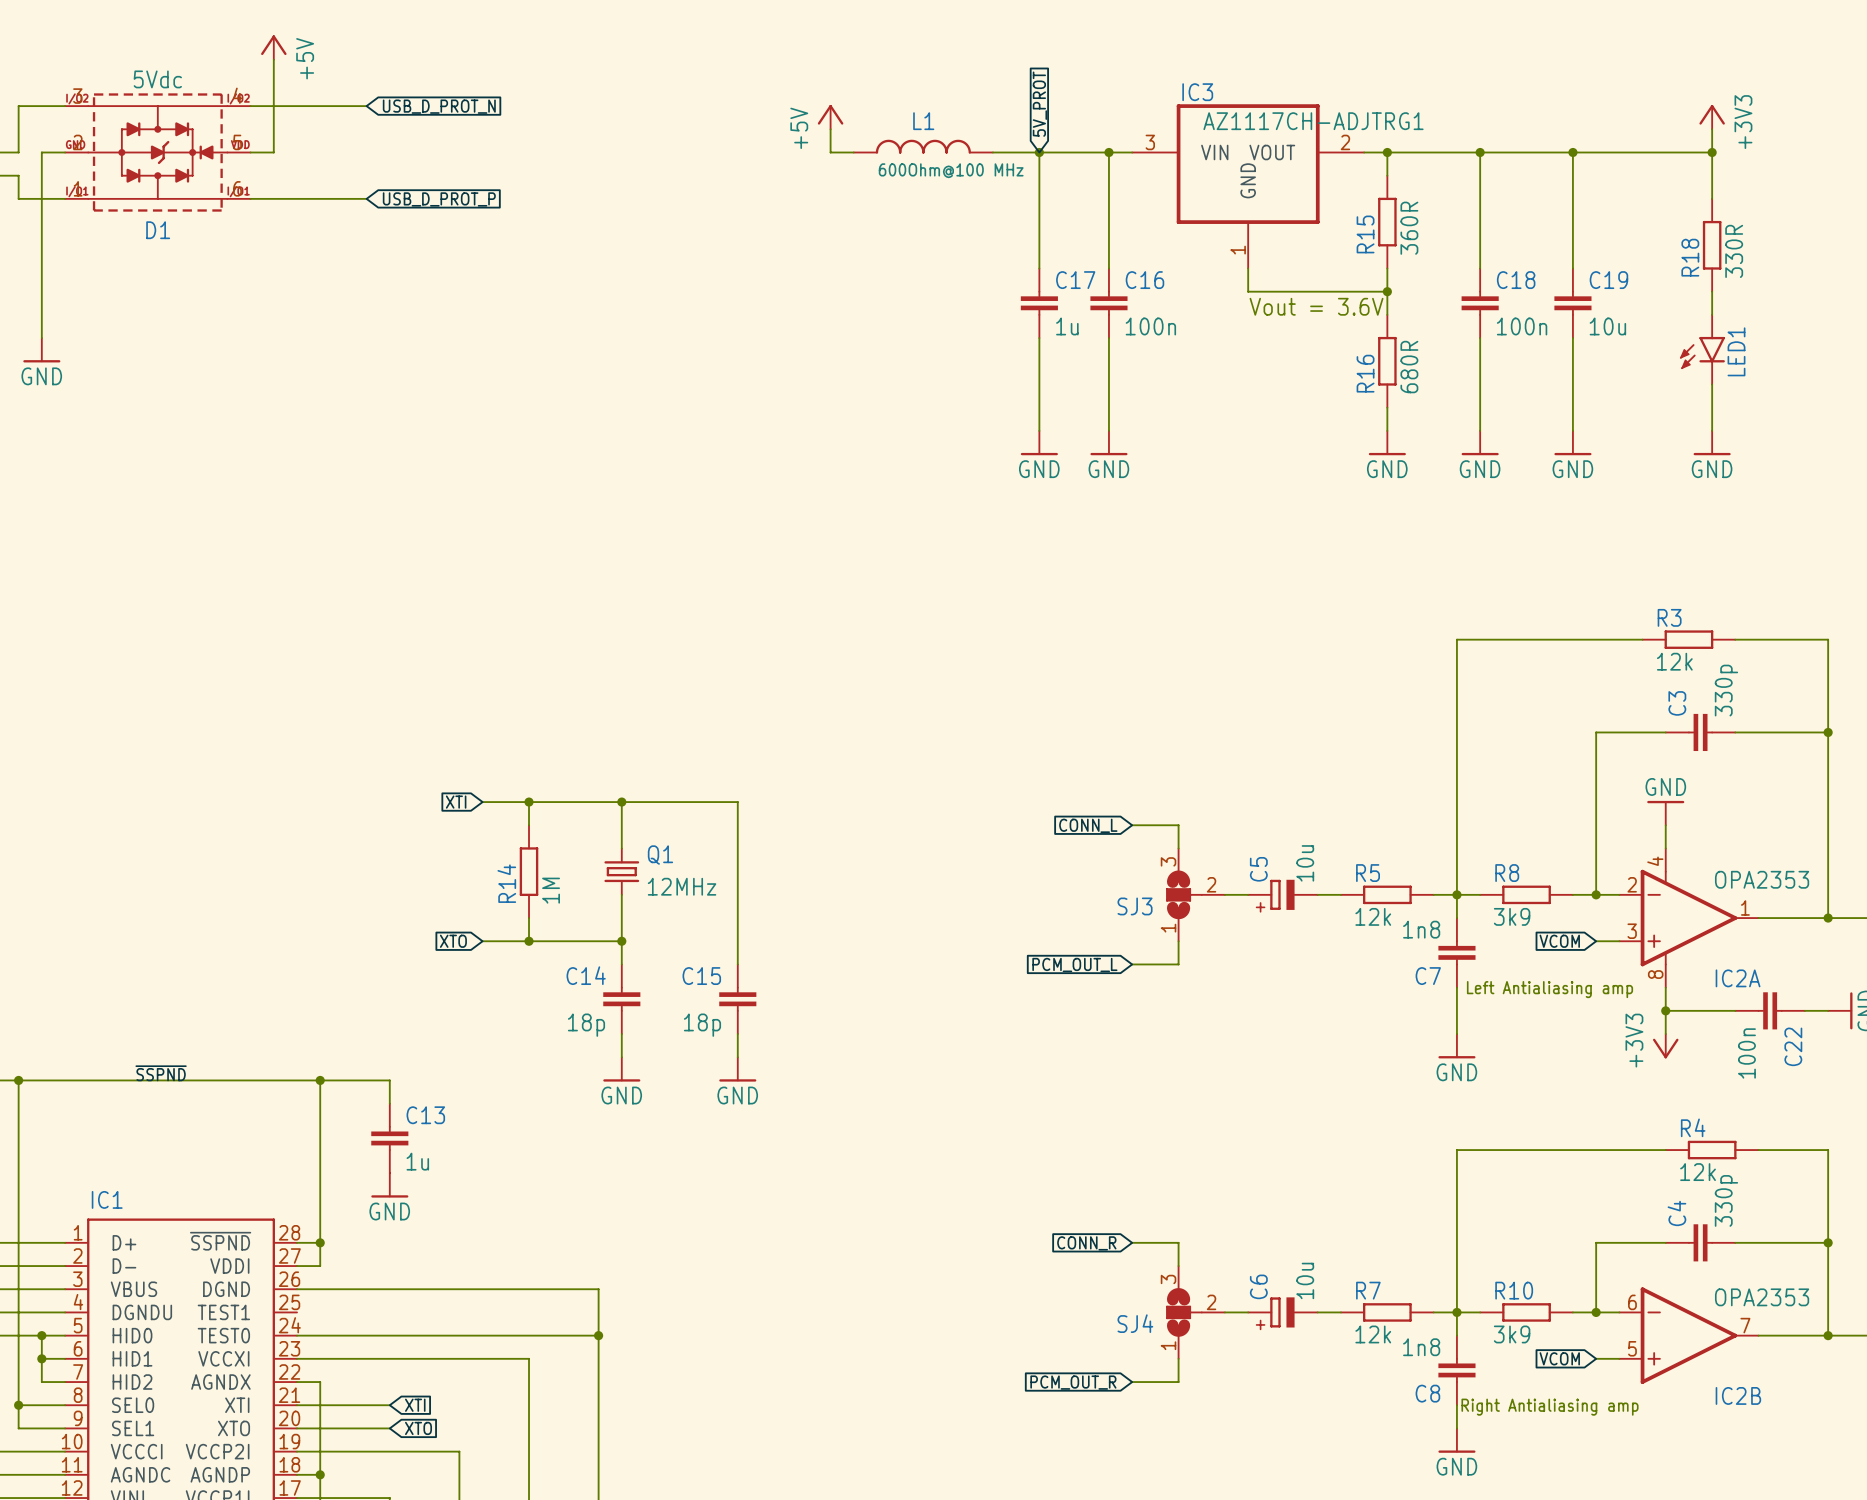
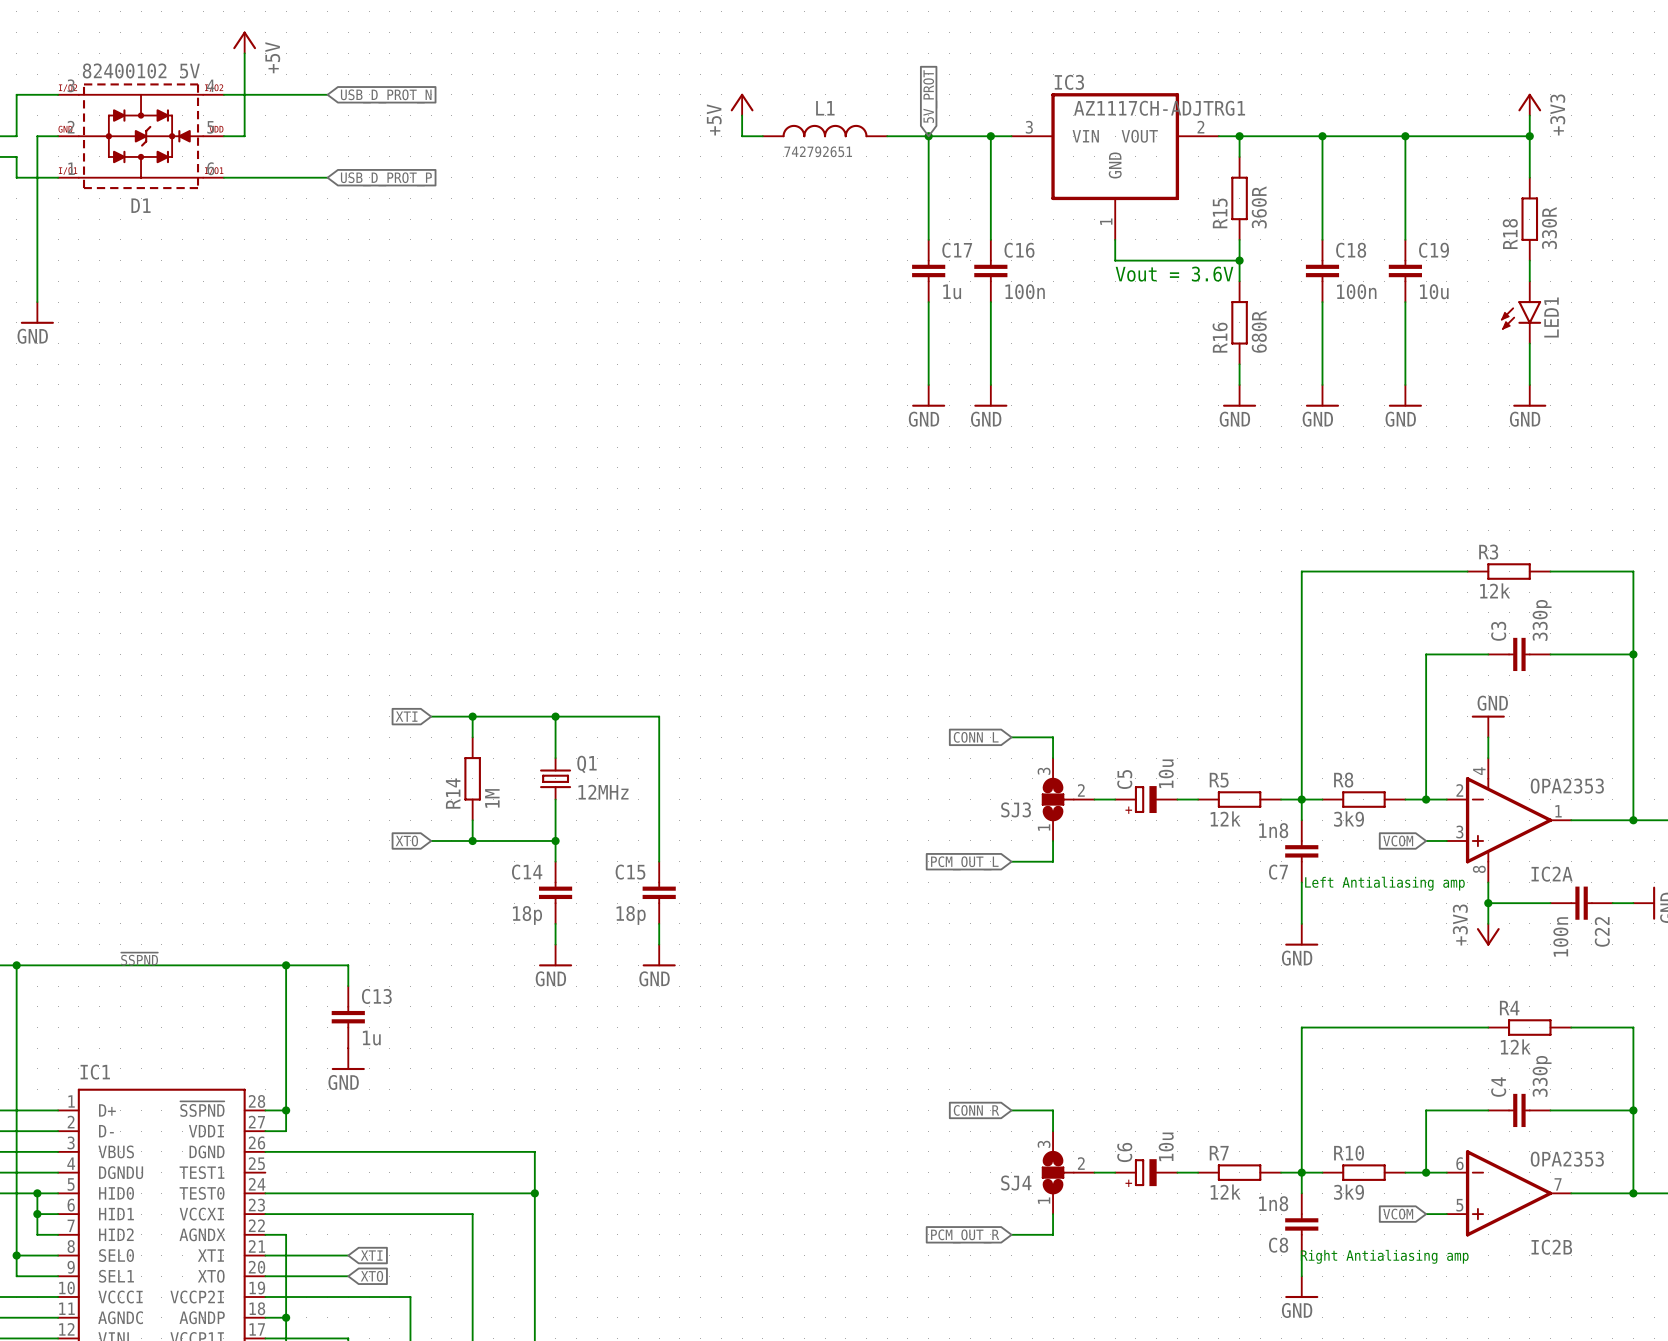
D1 value: 5Vdc (157, 79) -> 82400102 5V (141, 70)
L1 value: 600Ohm@100 MHz (951, 170) -> 742792651 (818, 151)

